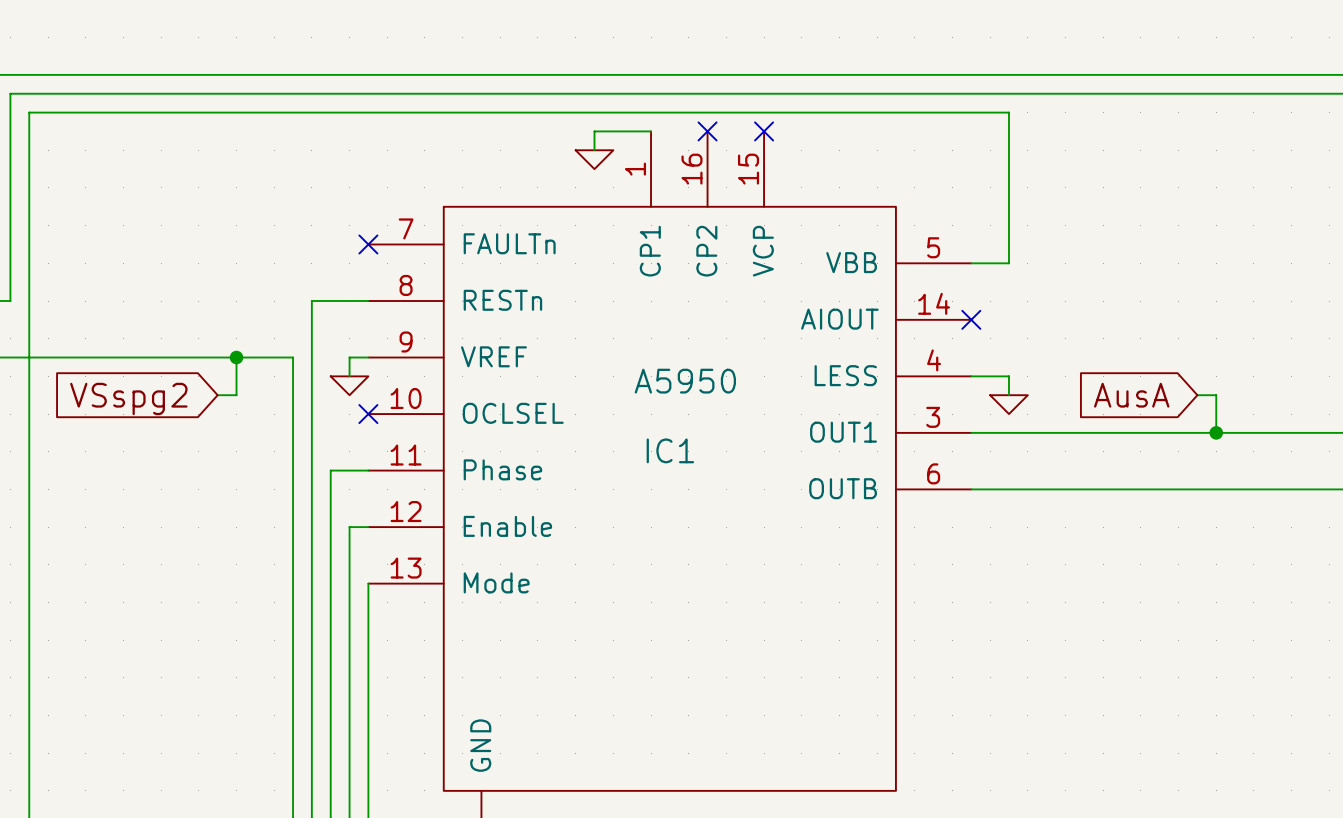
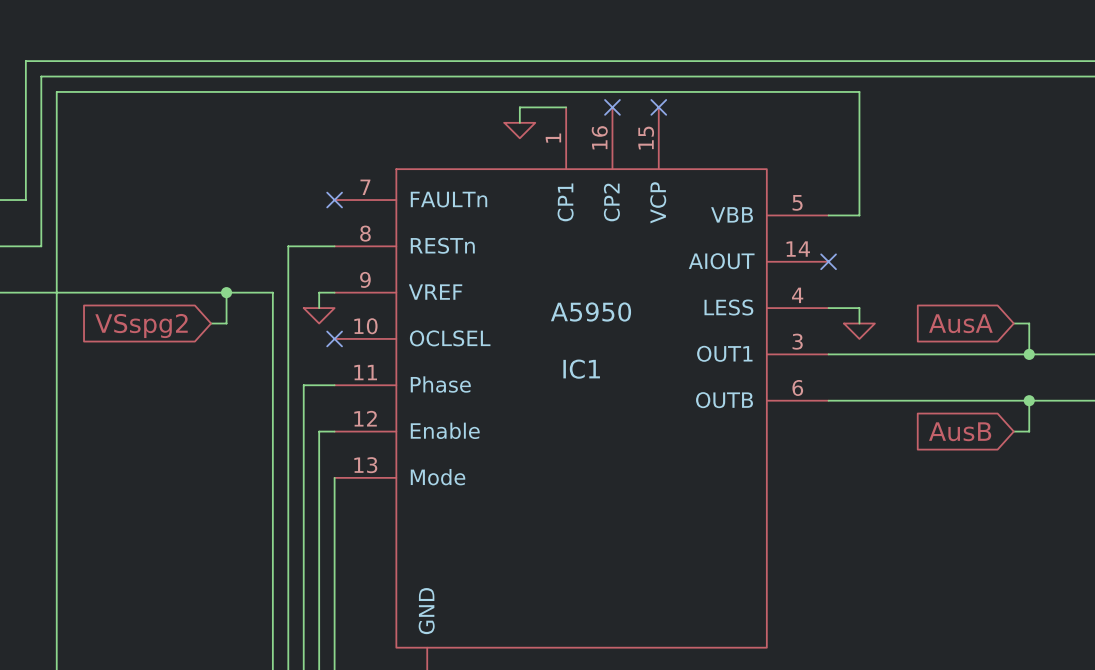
wire: none -> (1029, 400) (1029, 431) (1013, 431)
junction: none -> (1029, 400)
global label: none -> AusB (960, 431)

